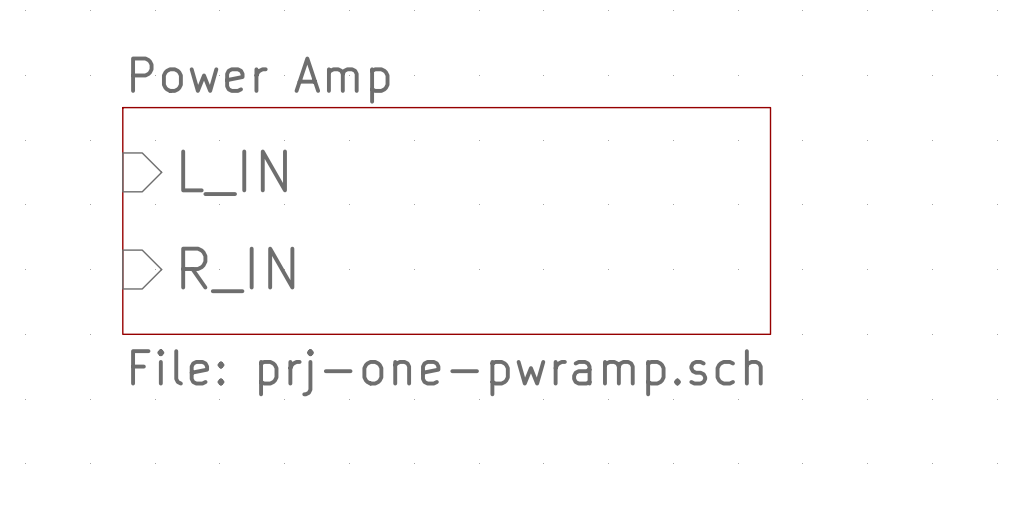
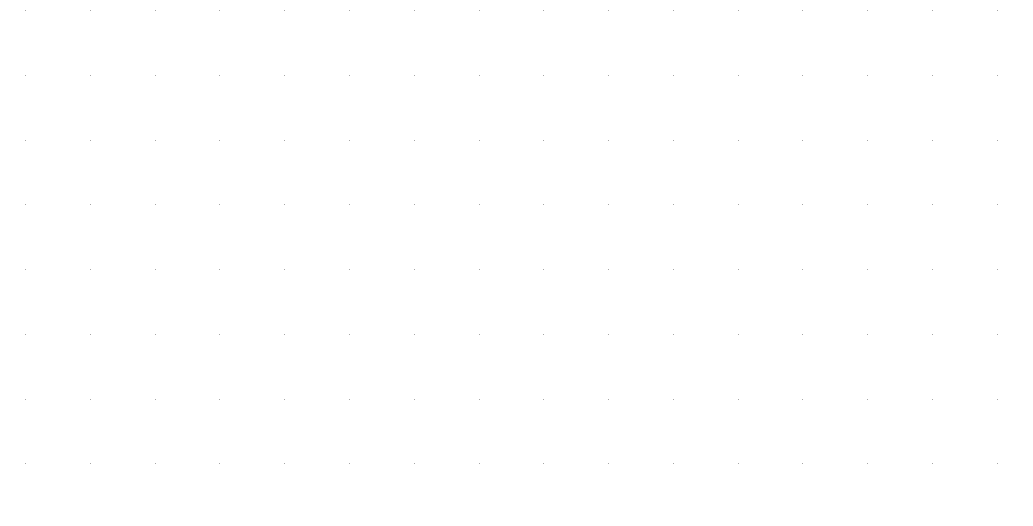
sheet pin: L_IN (234, 172) -> none
sheet Power Amp: File: prj-one-pwramp.sch (446, 220) -> none
sheet pin: R_IN (237, 269) -> none

